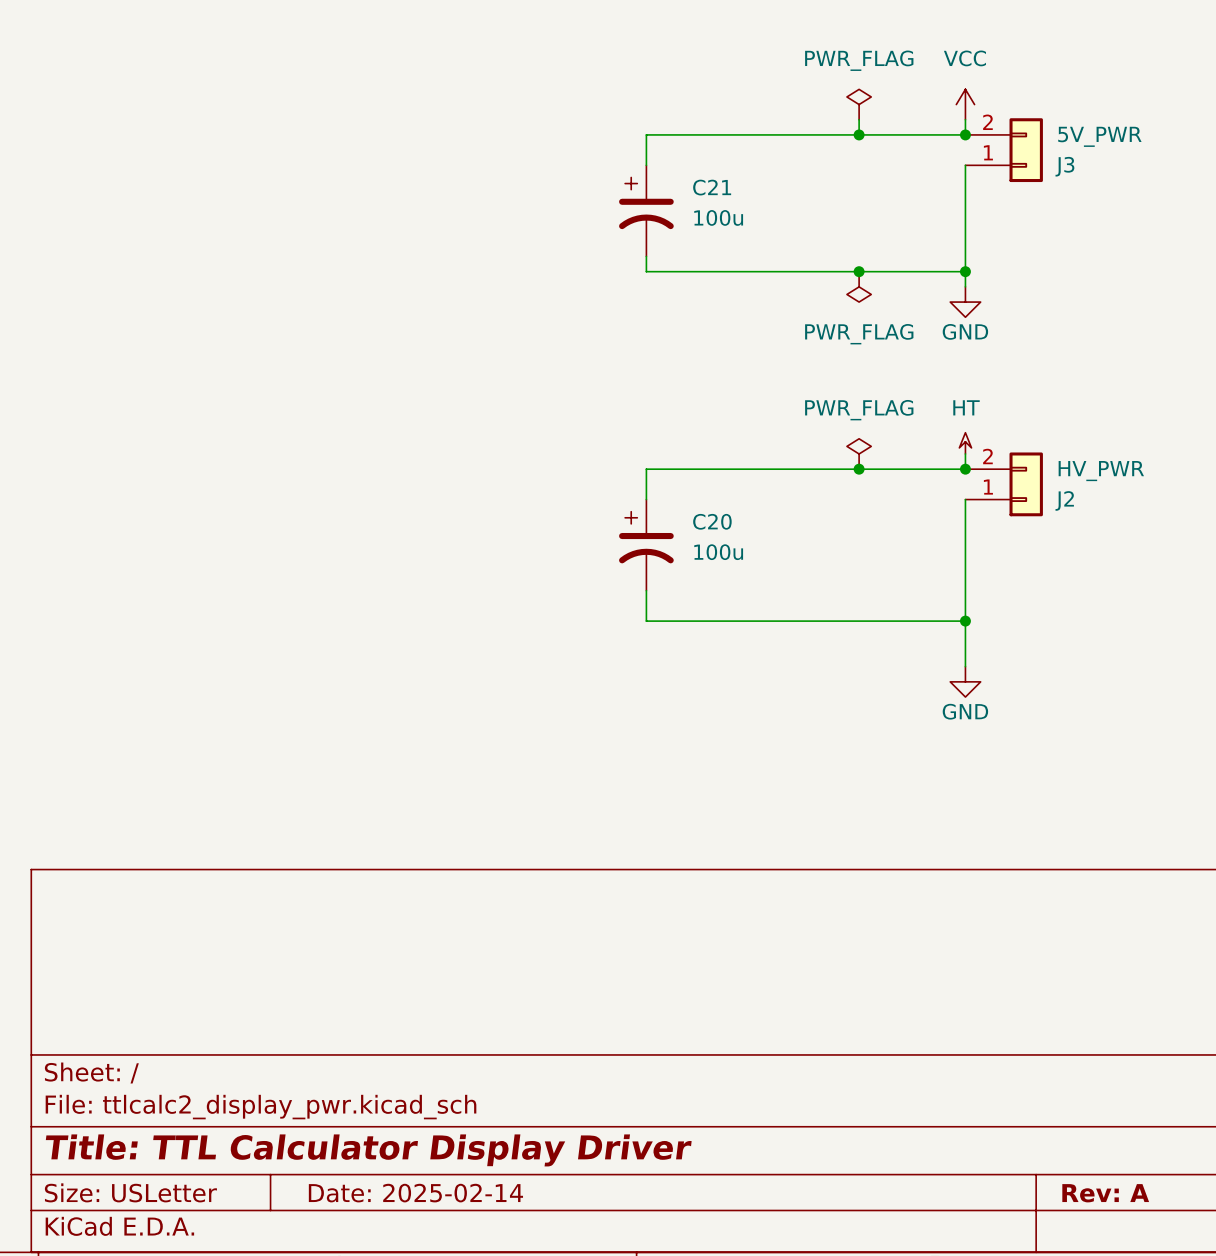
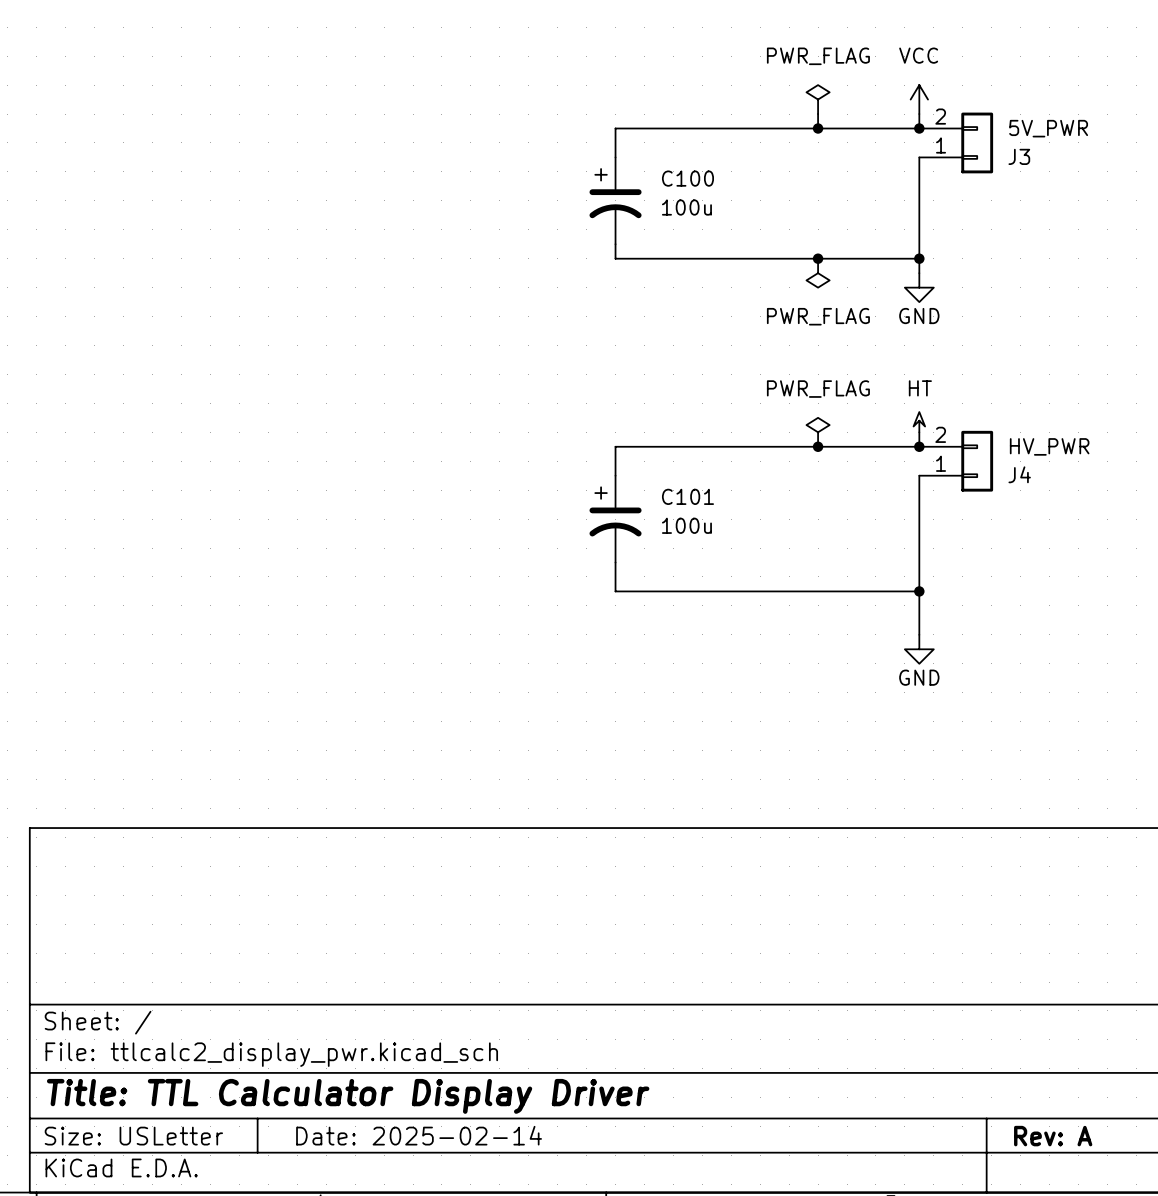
C21 name: C21 (712, 187) -> C100 (687, 178)
J2 name: J2 (1064, 500) -> J4 (1019, 474)
C20 name: C20 (712, 521) -> C101 (687, 496)

